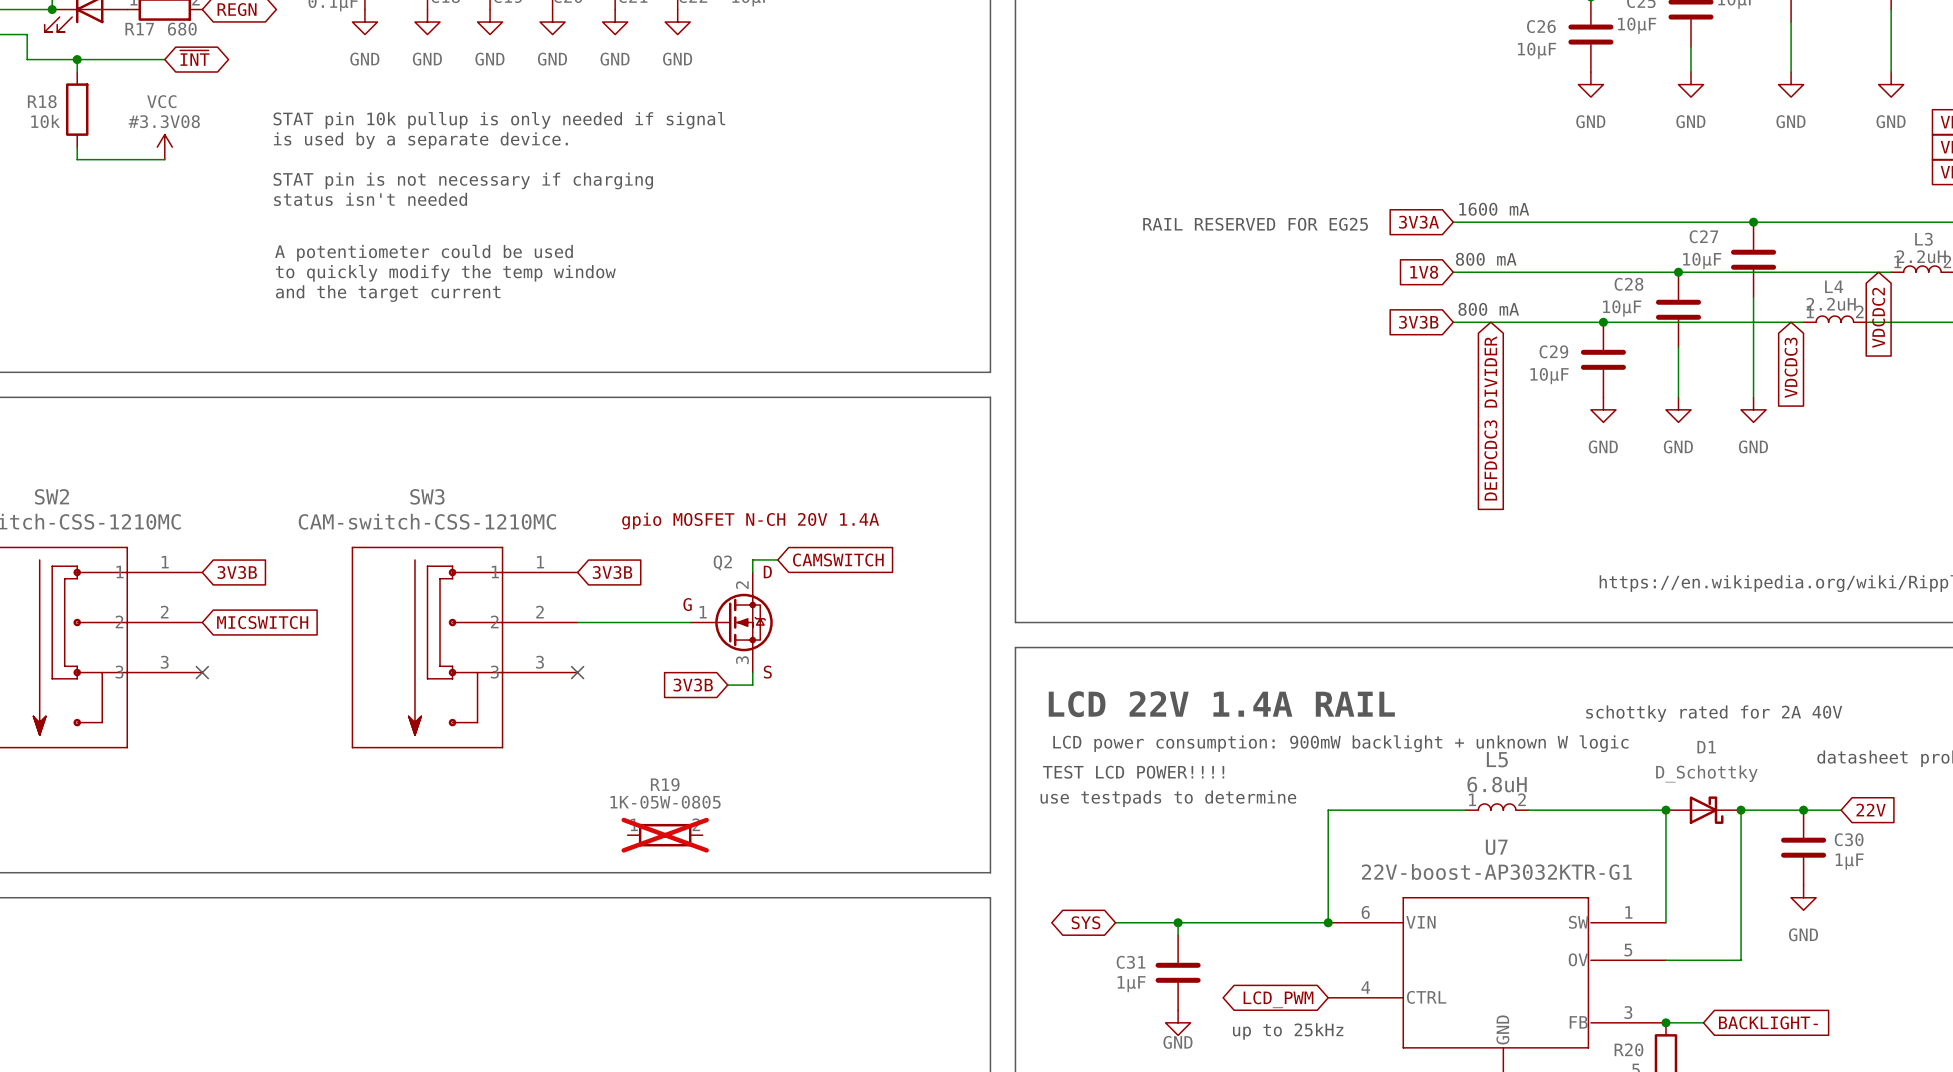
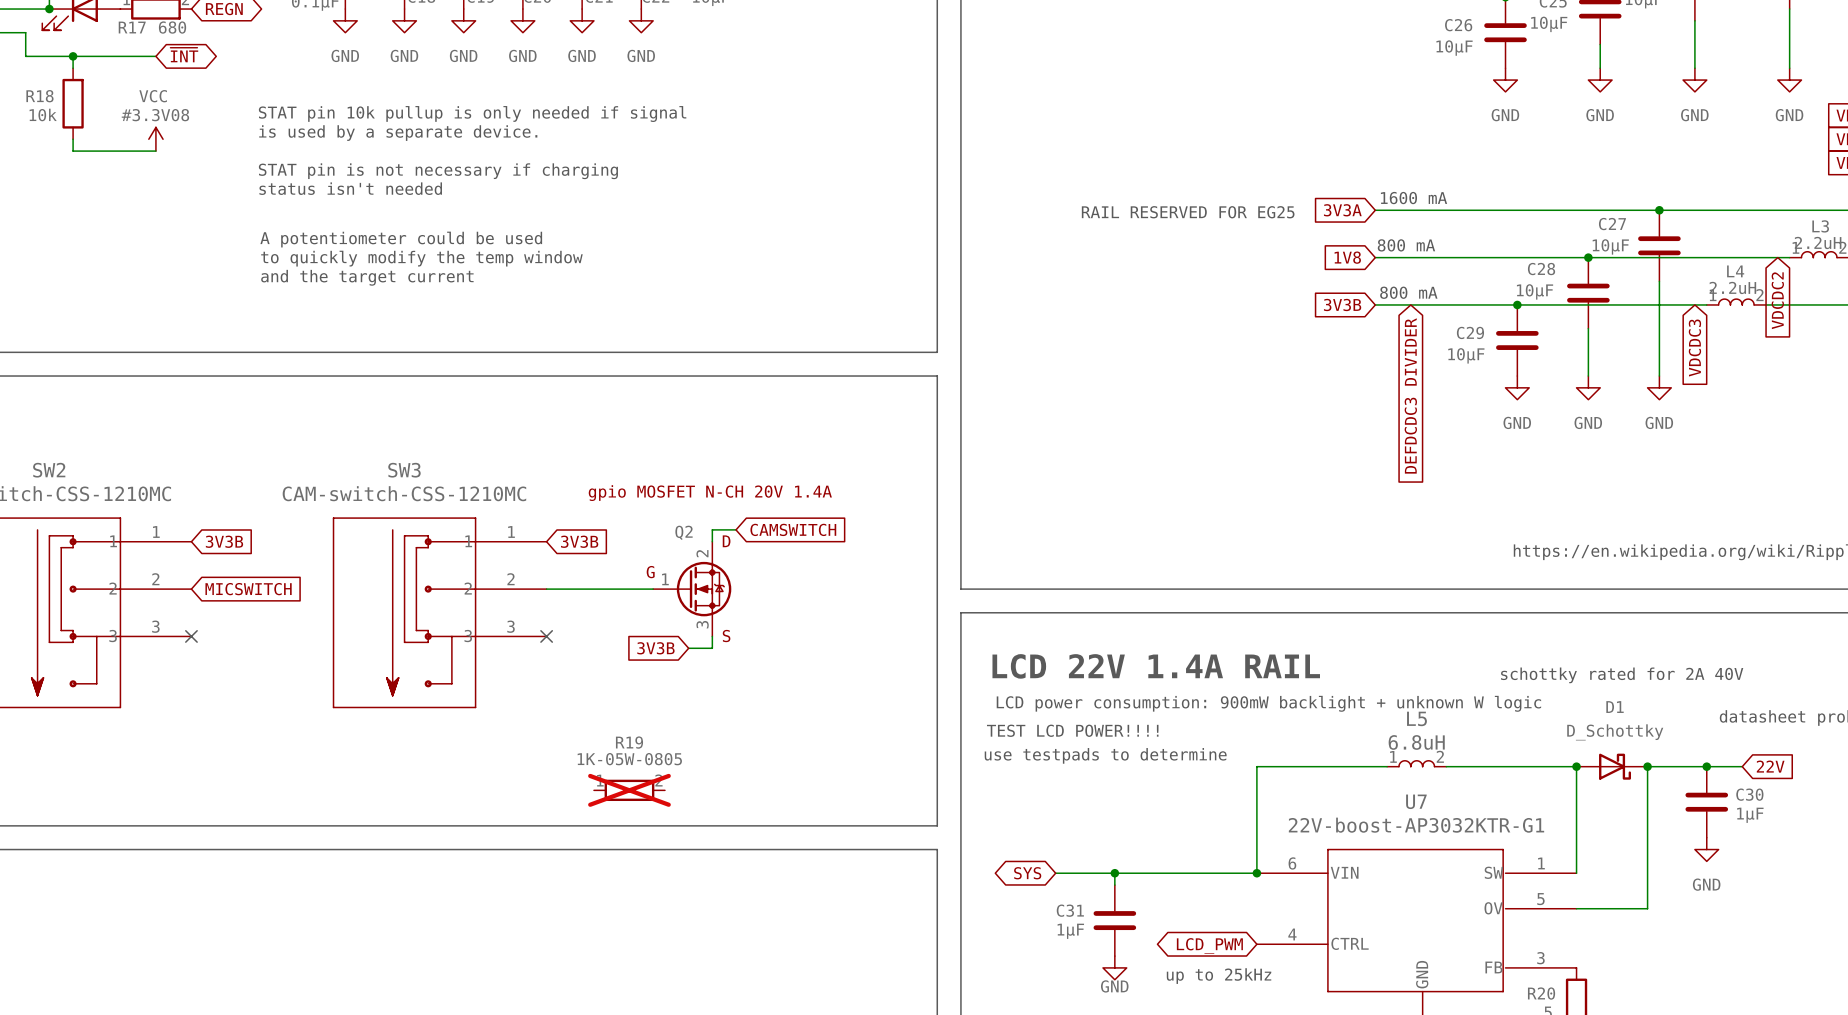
wire: (1665, 1022) (1703, 1022) -> none
junction: (1665, 1022) -> none
global label: BACKLIGHT- (1768, 1022) -> none

